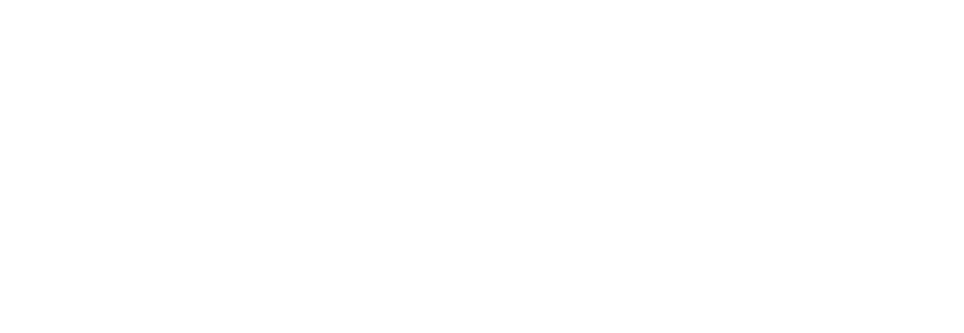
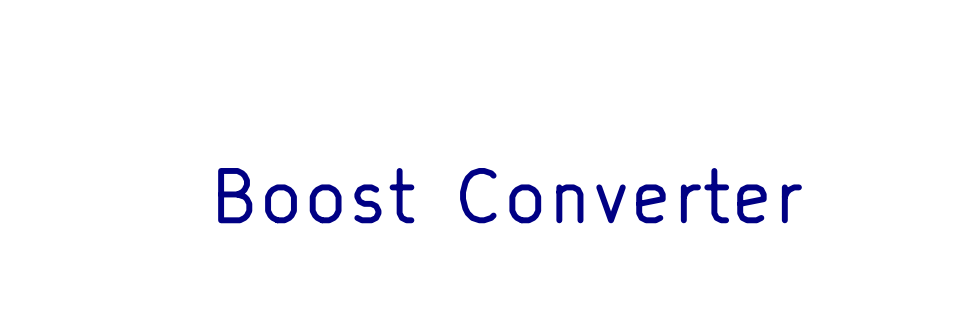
text: none -> Boost Converter (510, 195)

